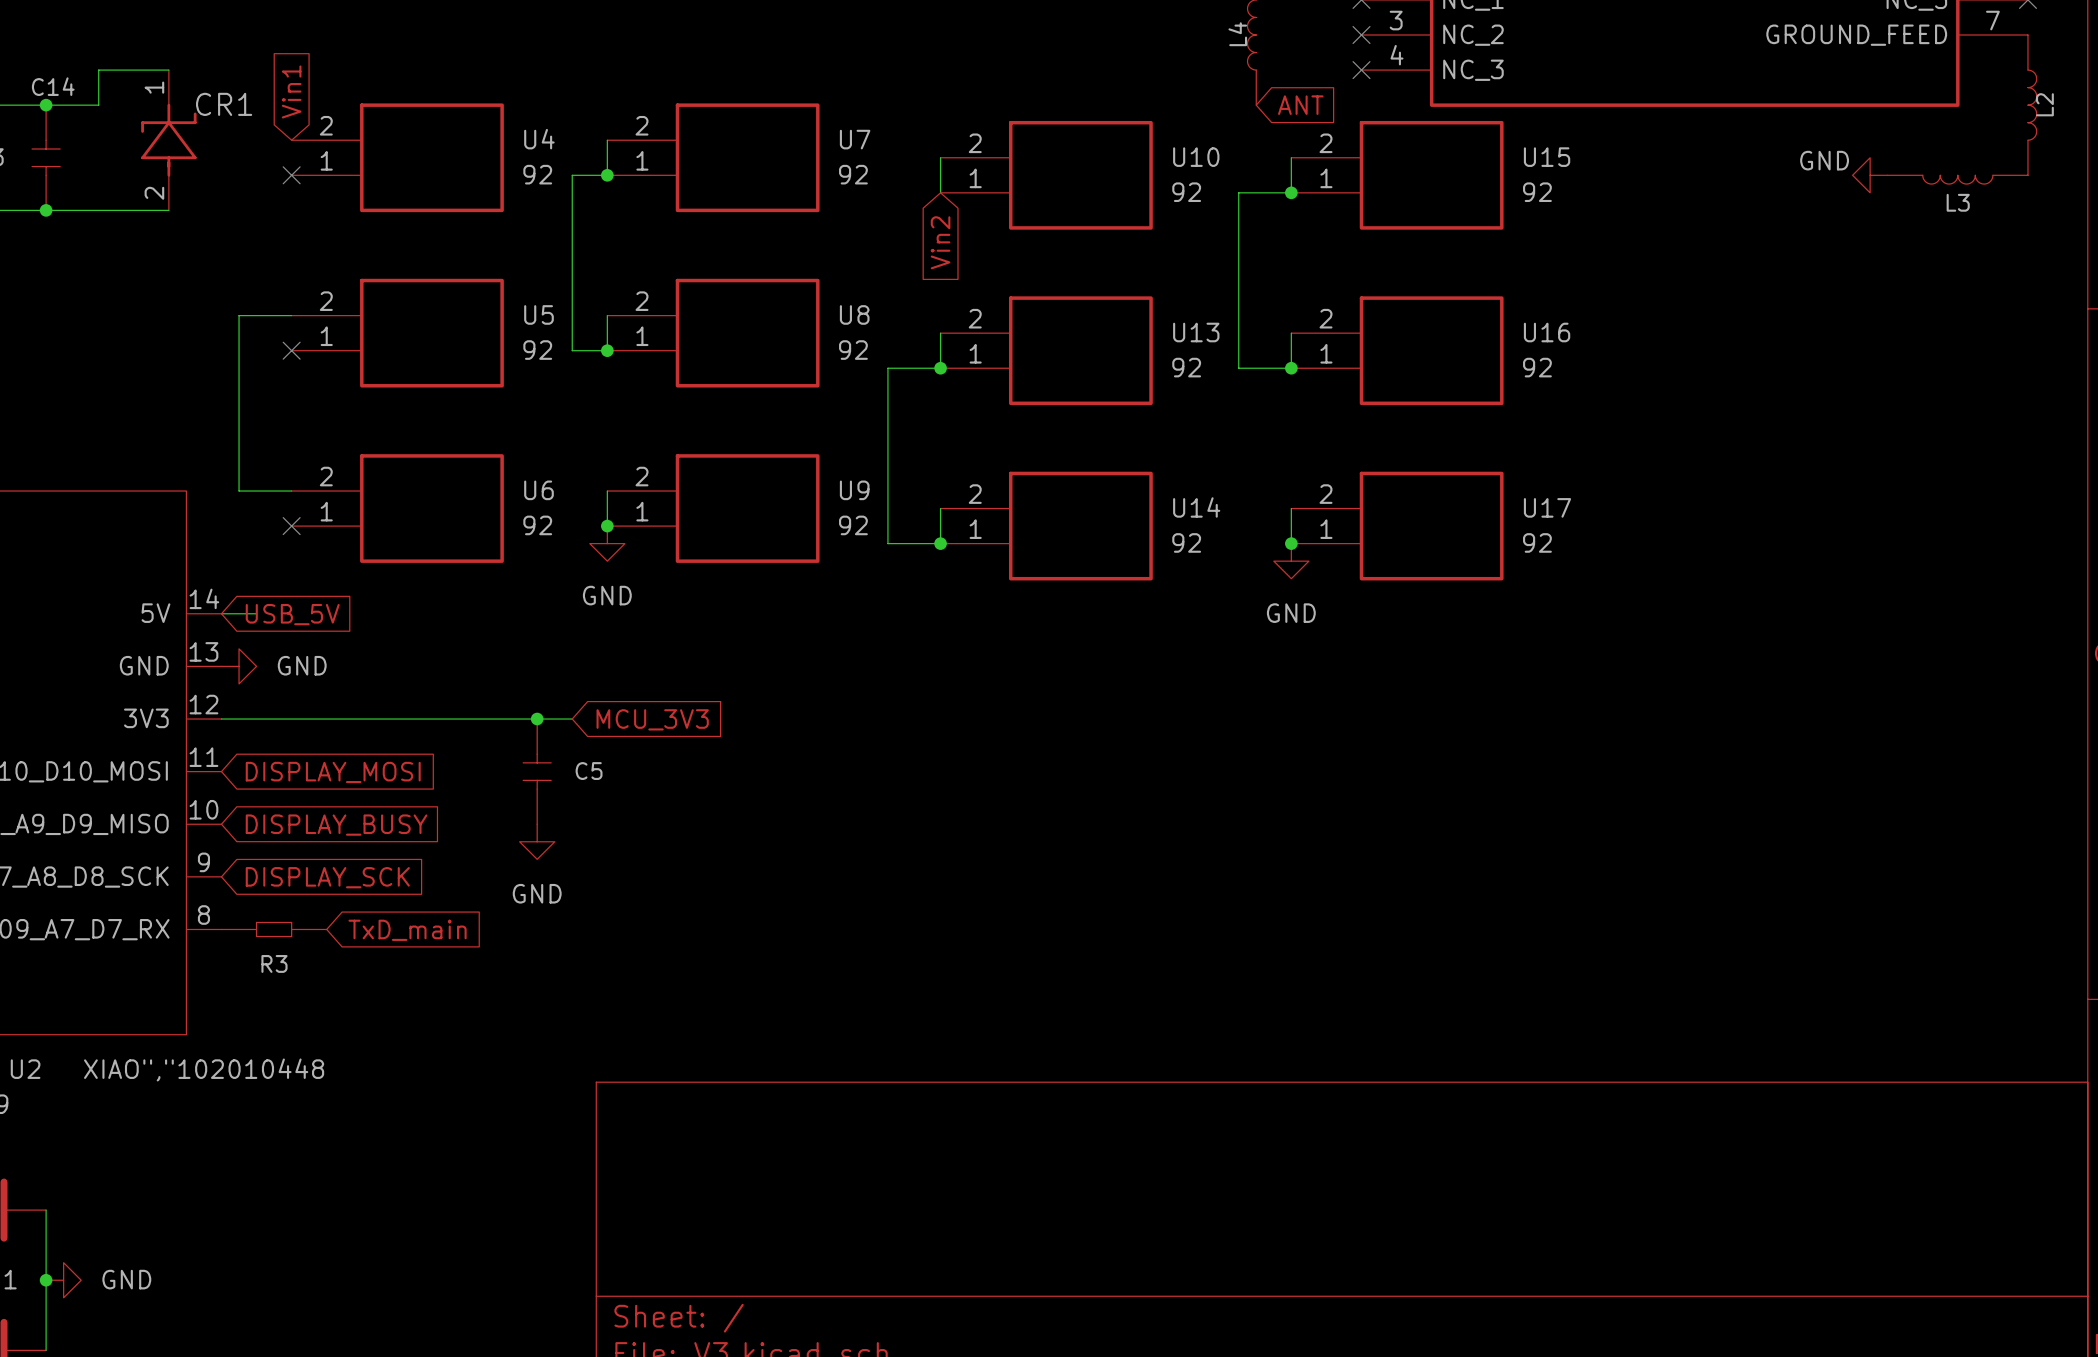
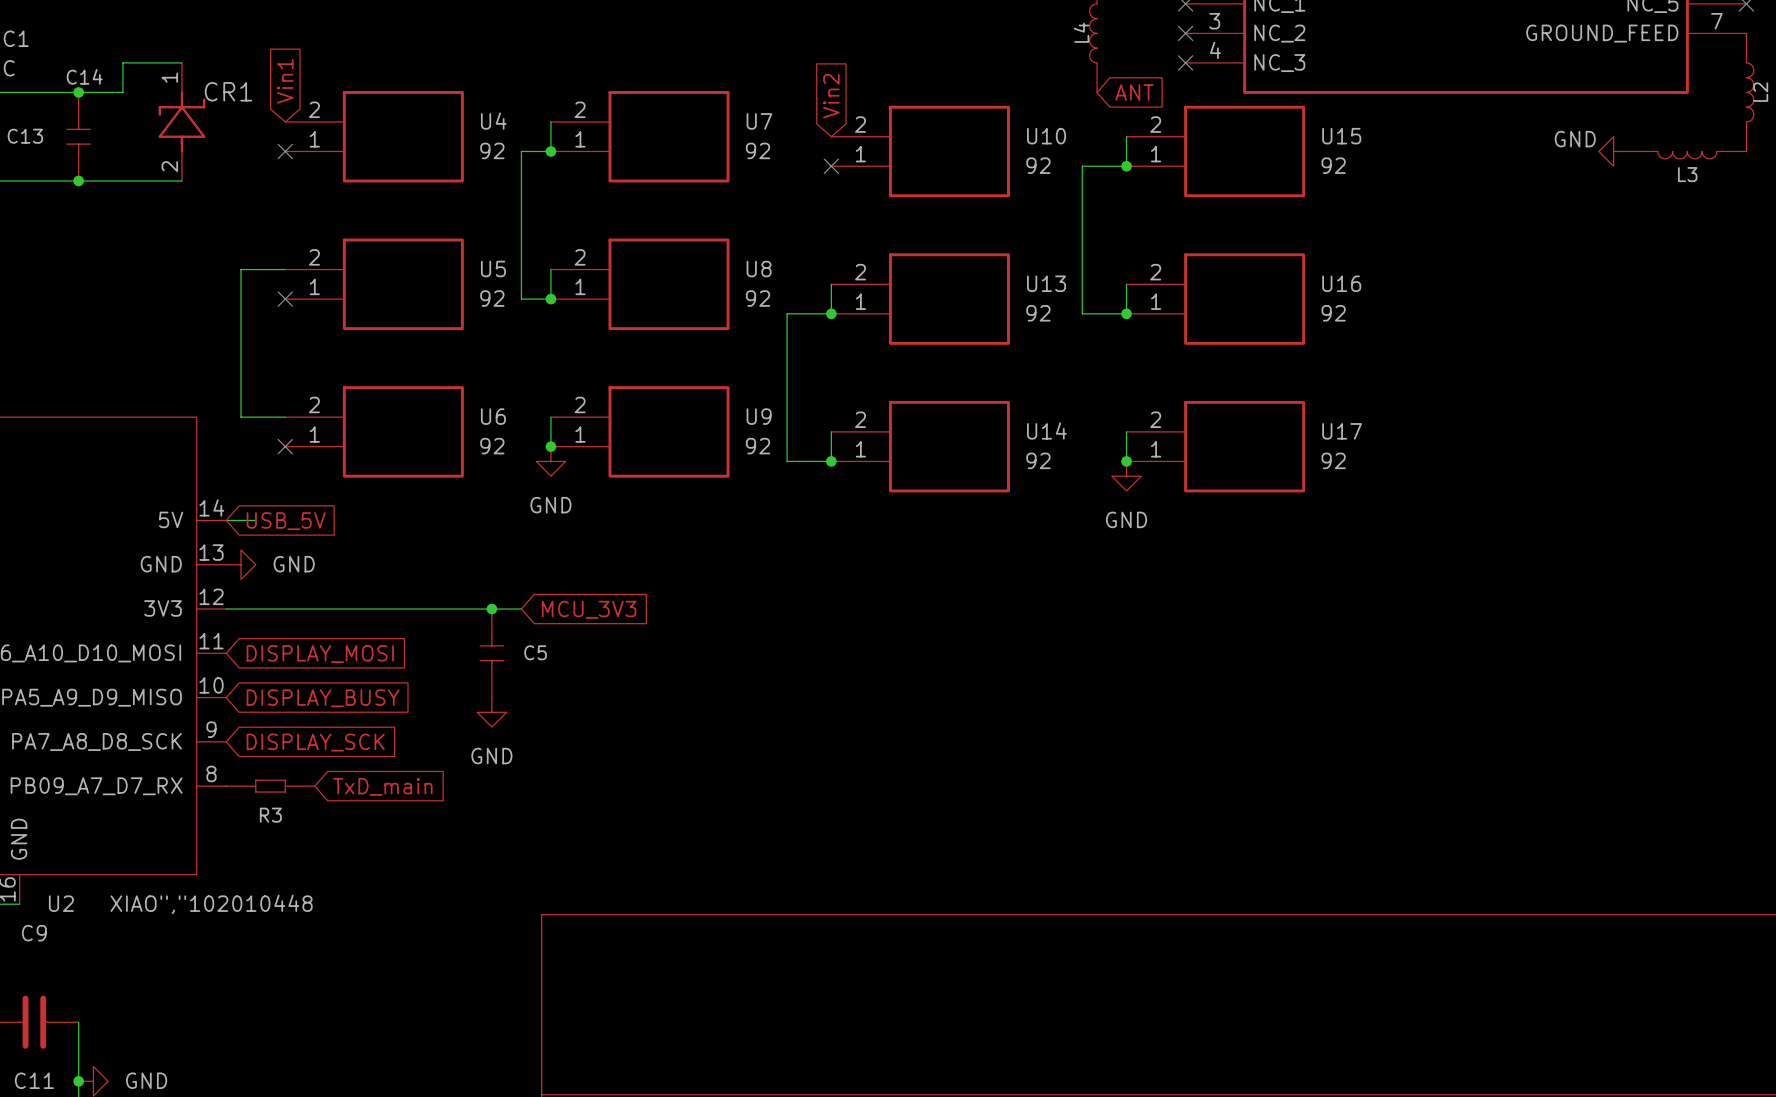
wire: (940, 157) (940, 192) -> none
no-connect mark: none -> (831, 166)
global label rotation: 0° (940, 242) -> 180° (831, 96)
global label position: Vin2 (940, 242) -> Vin2 (831, 96)

